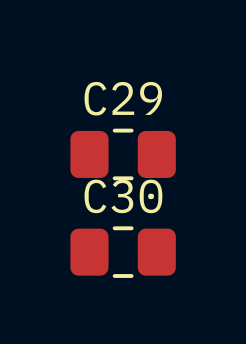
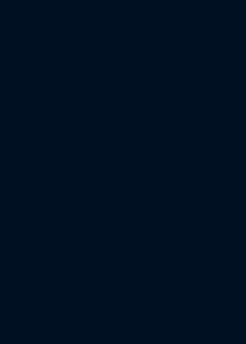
C29: (123, 154) -> none
C30: (123, 252) -> none

